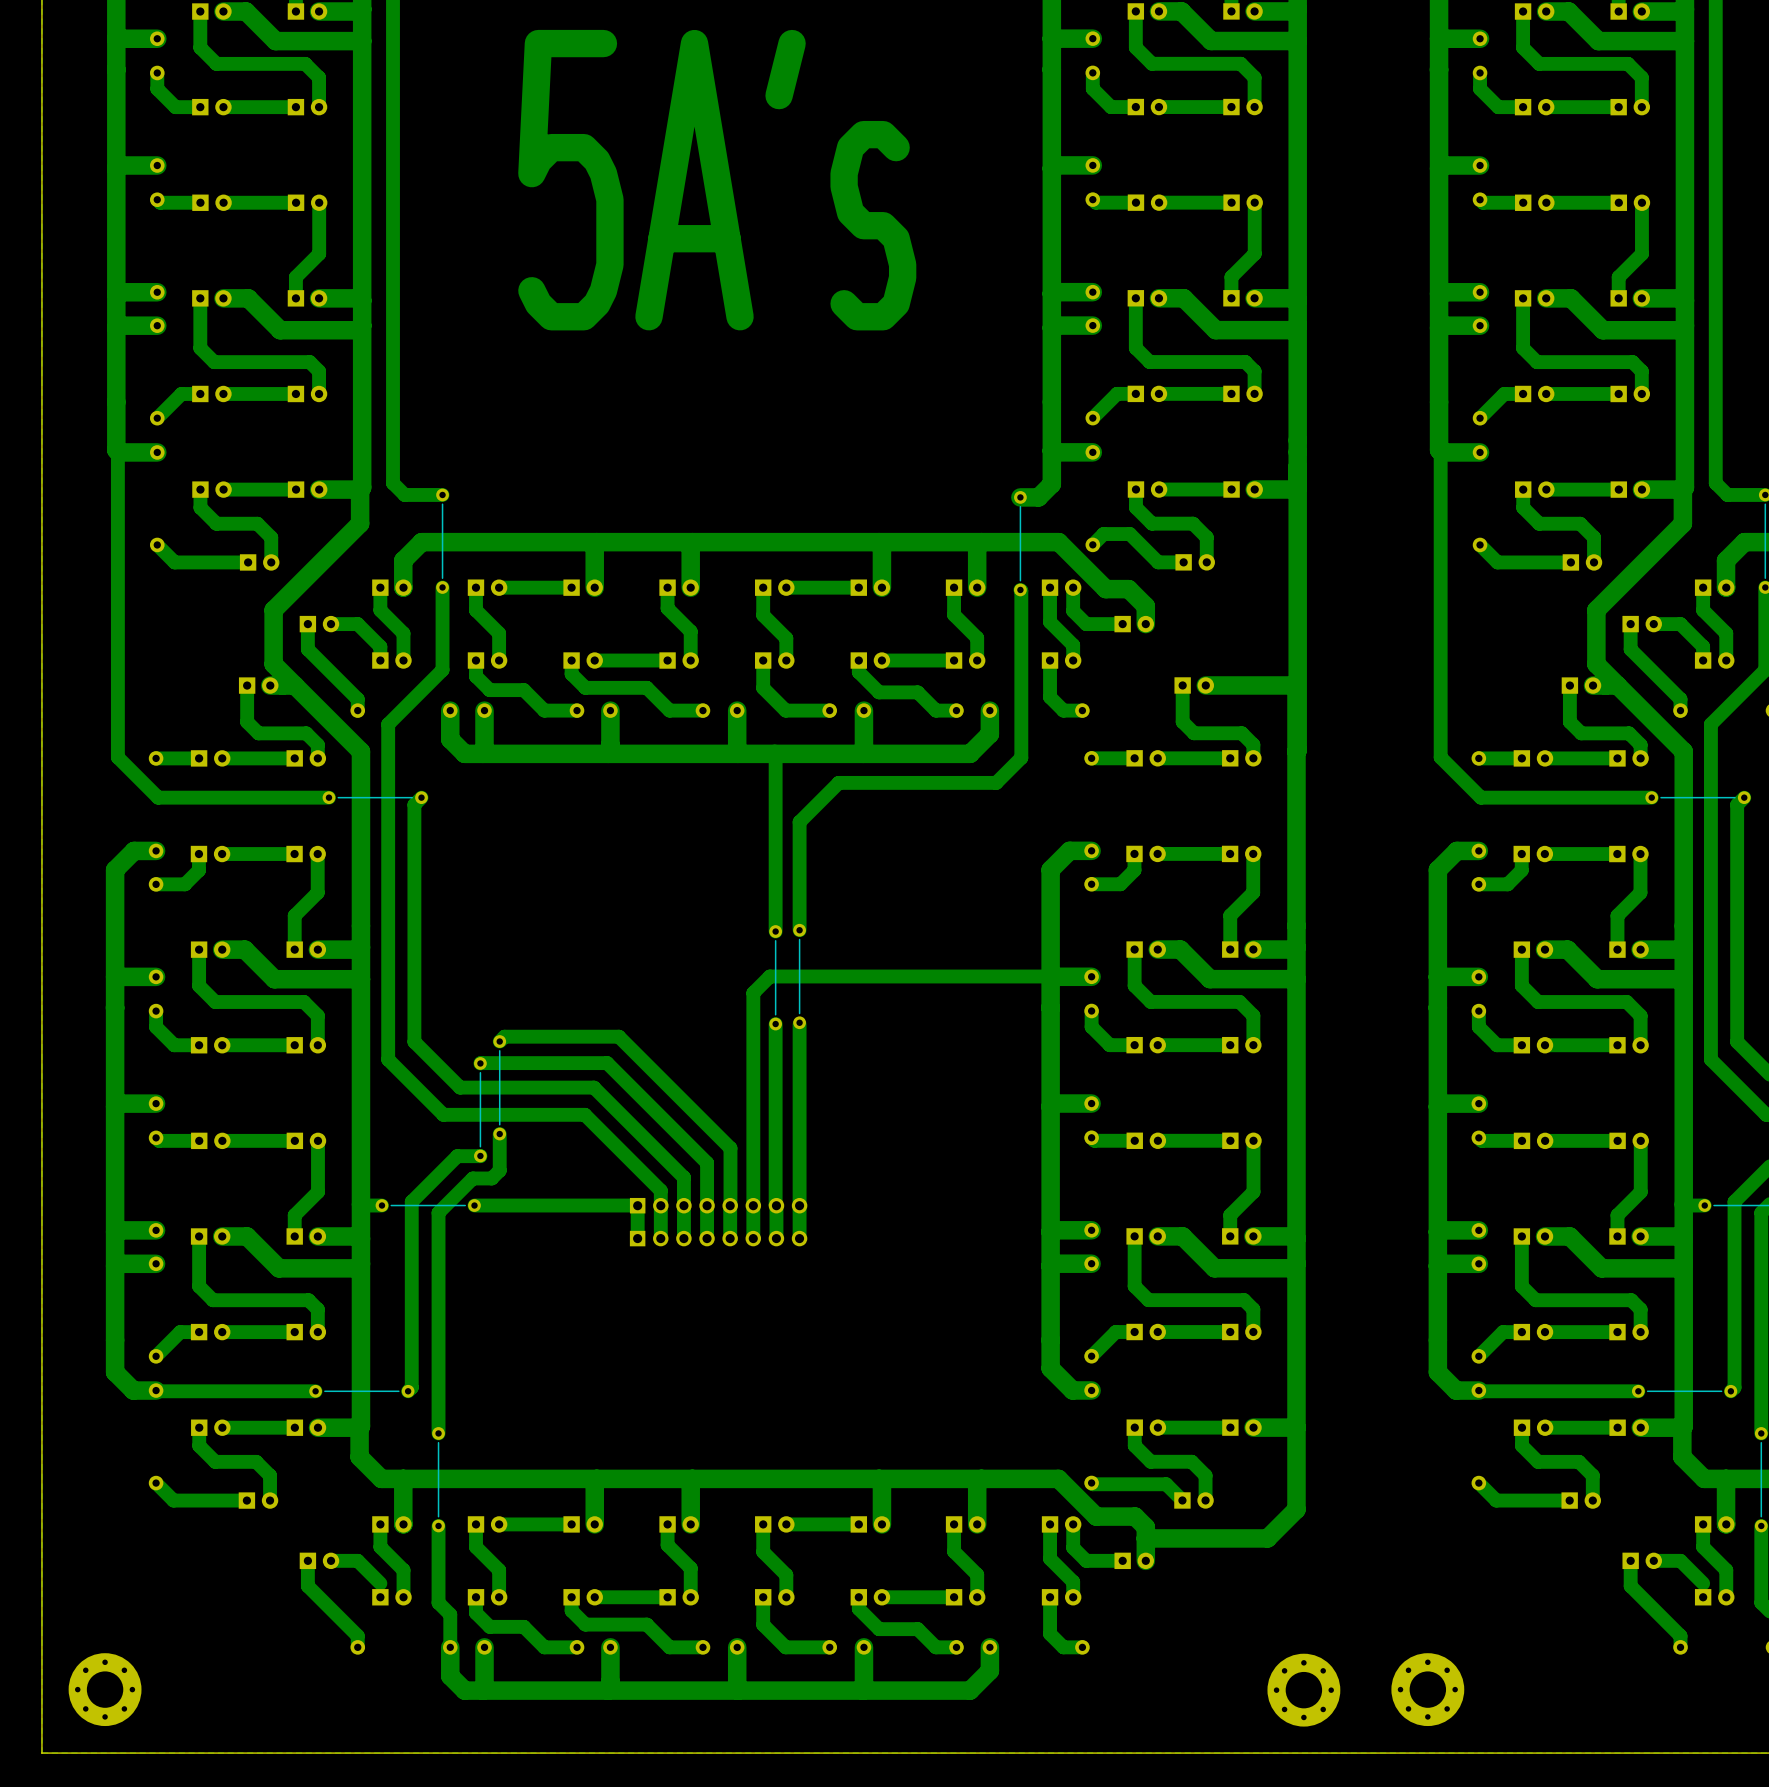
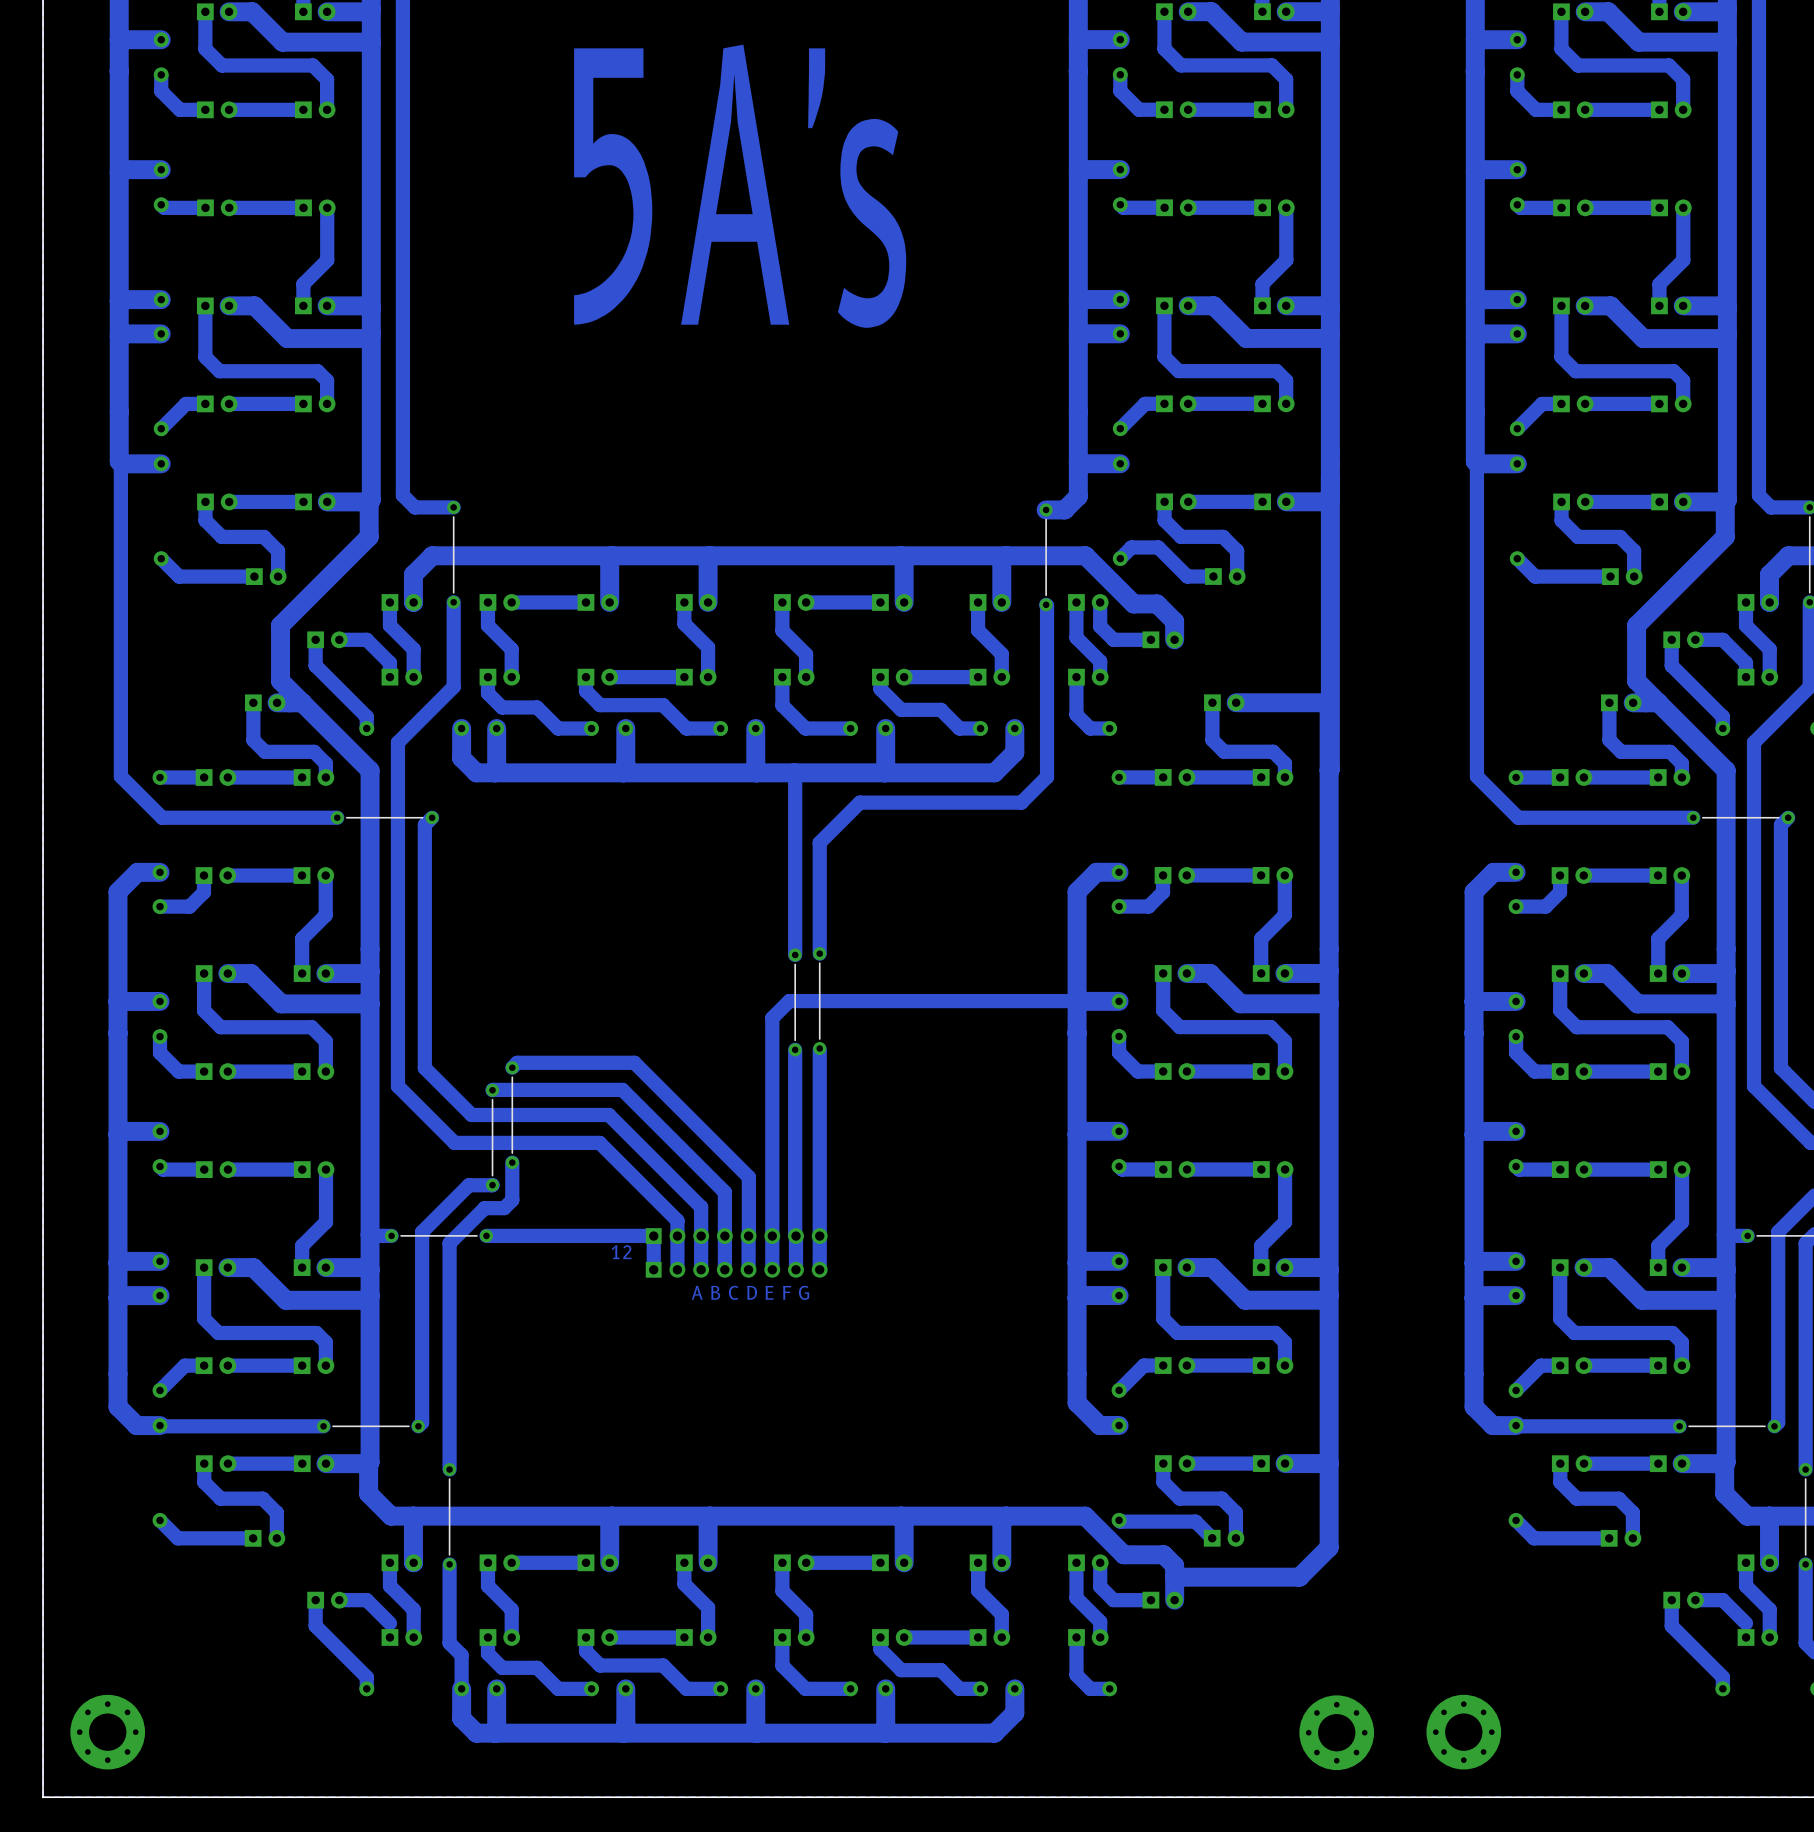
text: none -> 12 (621, 1252)
text: none -> A B C D E F G (750, 1292)

